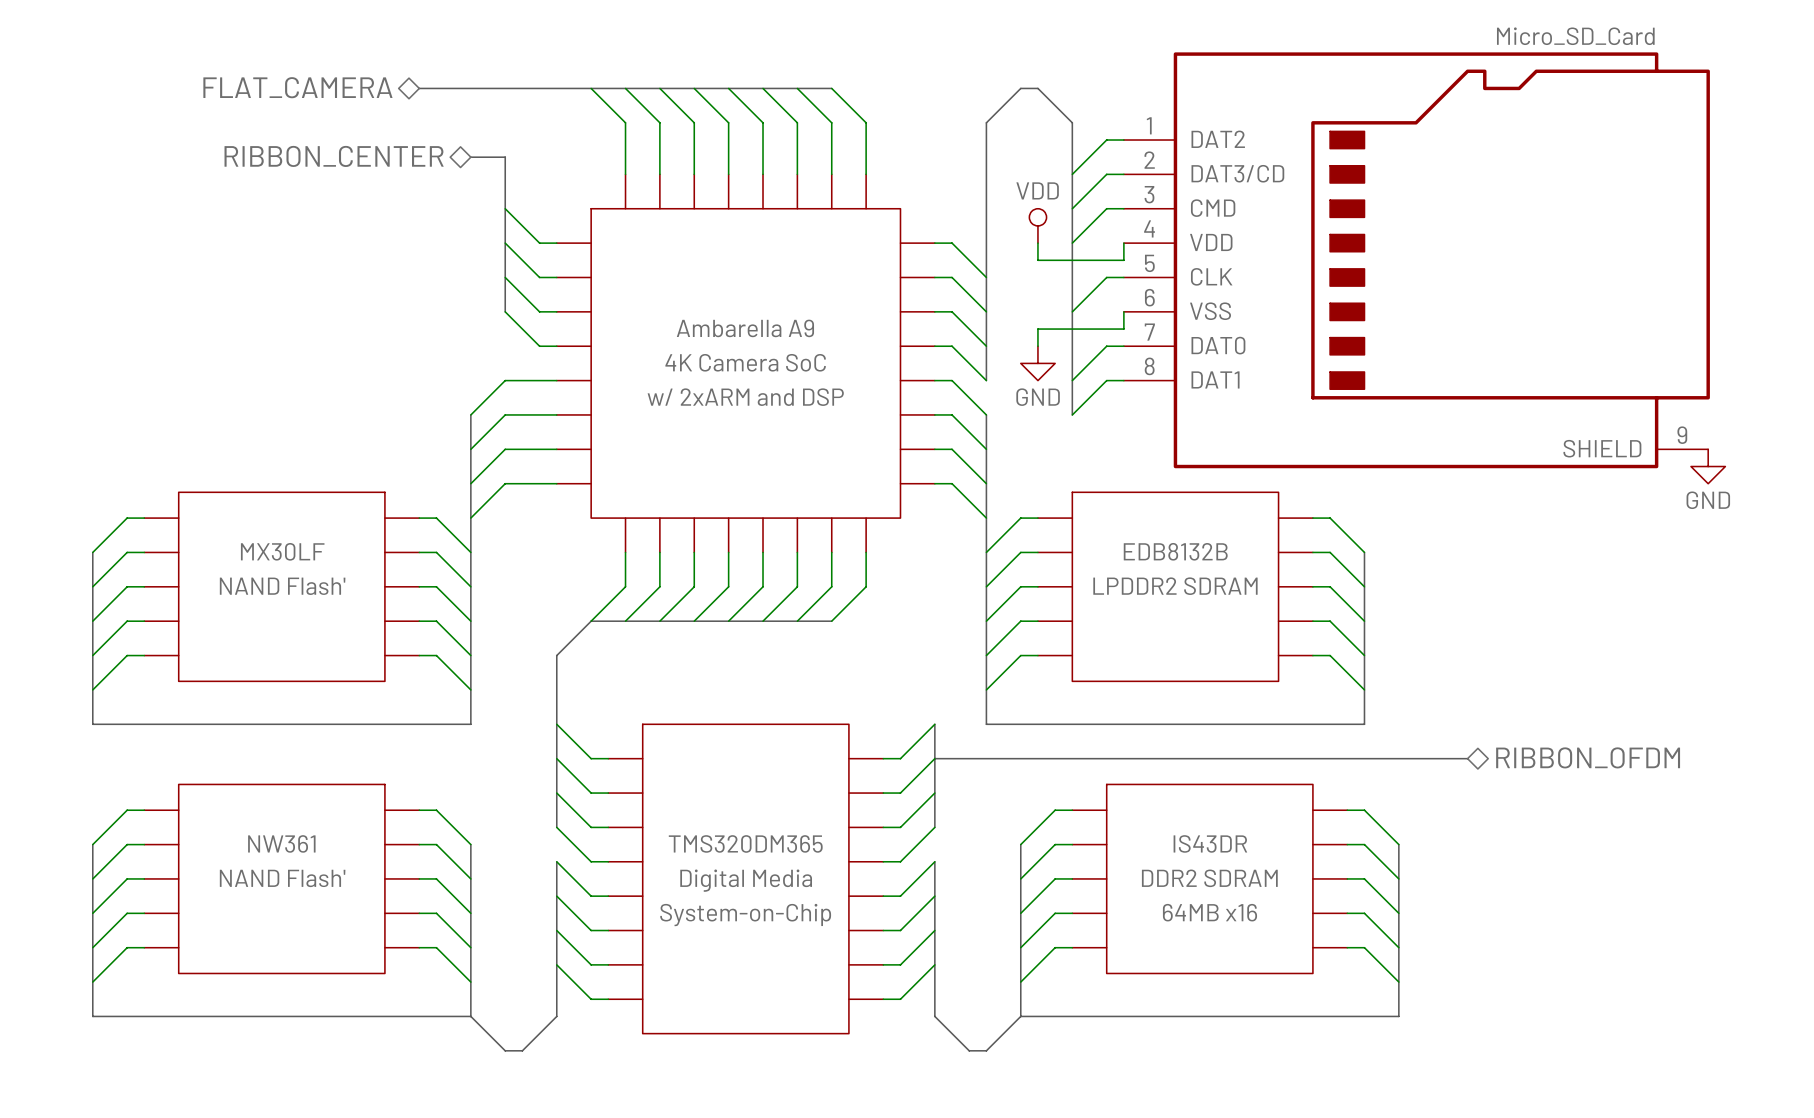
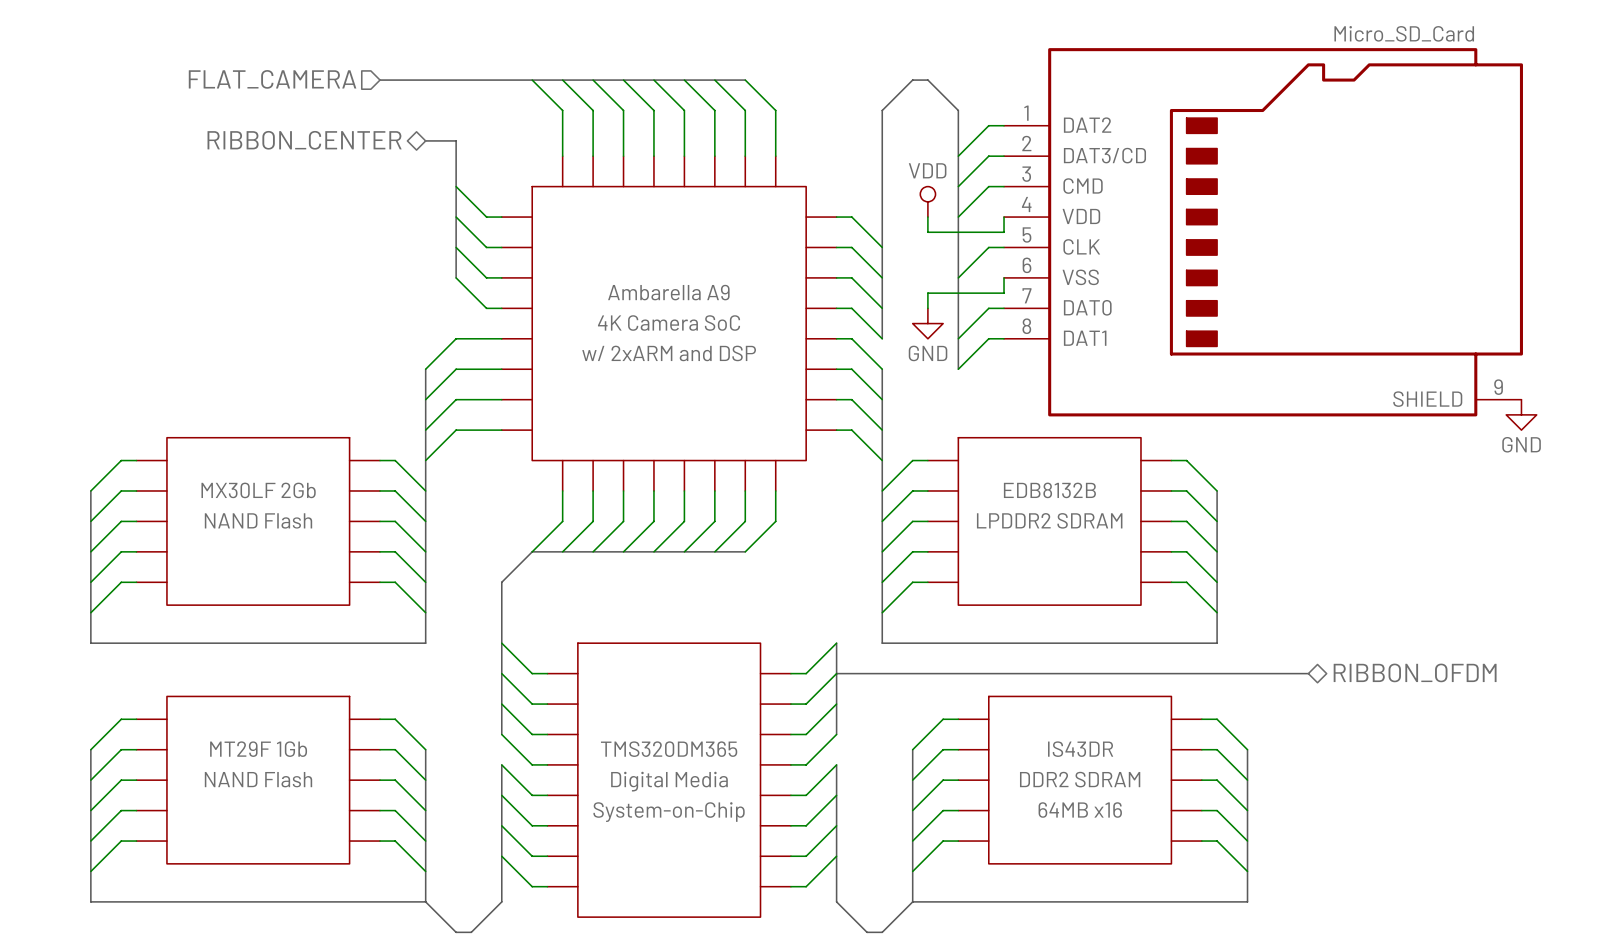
hierarchical label shape: bidirectional (297, 87) -> input (272, 79)
part value: MX30LF (282, 551) -> MX30LF 2Gb (258, 490)
part text: NAND Flash' (282, 586) -> NAND Flash (258, 520)
part value: NW361 (281, 843) -> MT29F 1Gb (258, 749)
part text: NAND Flash' (282, 878) -> NAND Flash (258, 779)

